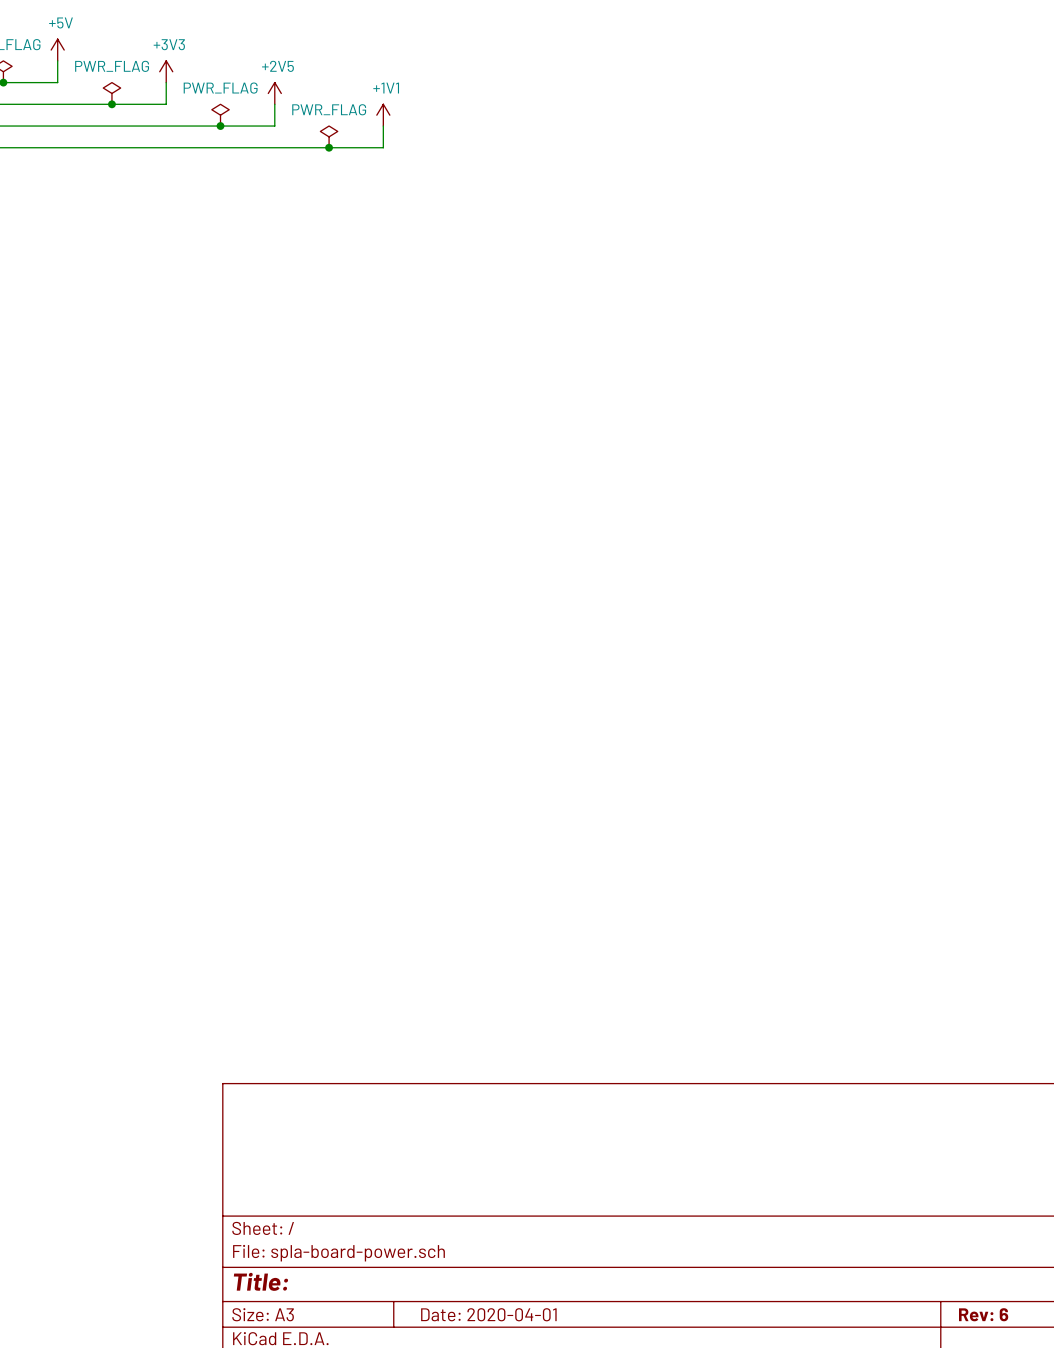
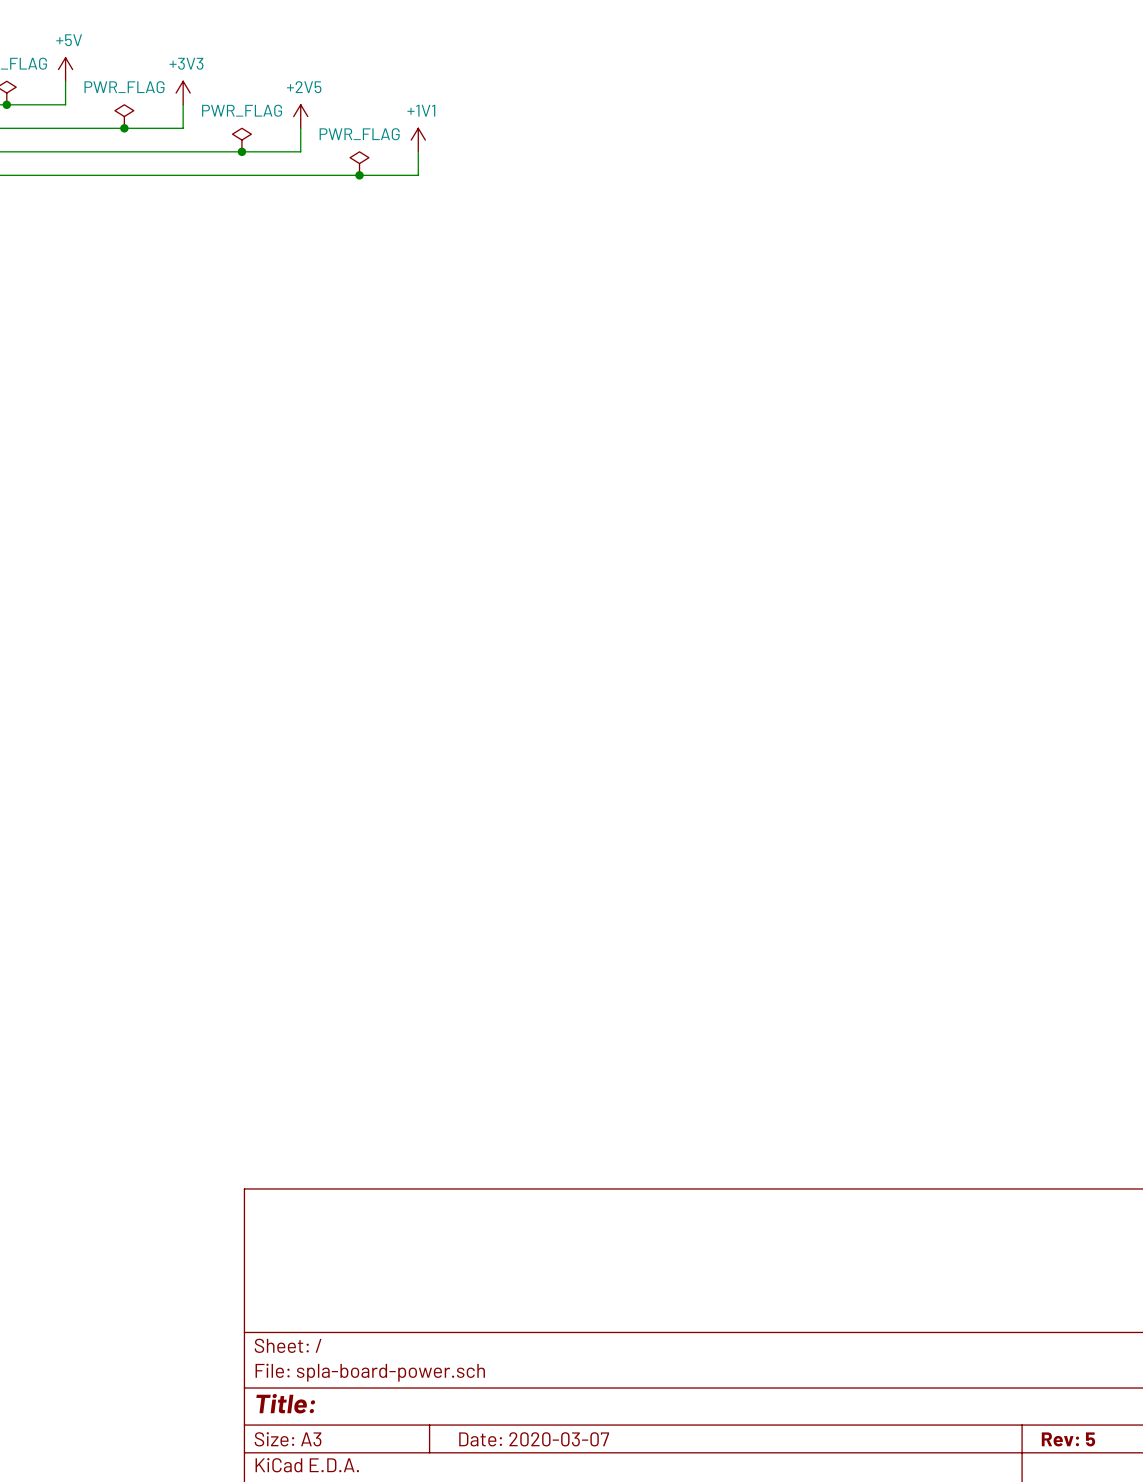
title block: Date: 2020-04-01 (488, 1314) -> Date: 2020-03-07 (534, 1439)
title block: Rev: 6 (983, 1314) -> Rev: 5 (1068, 1439)

